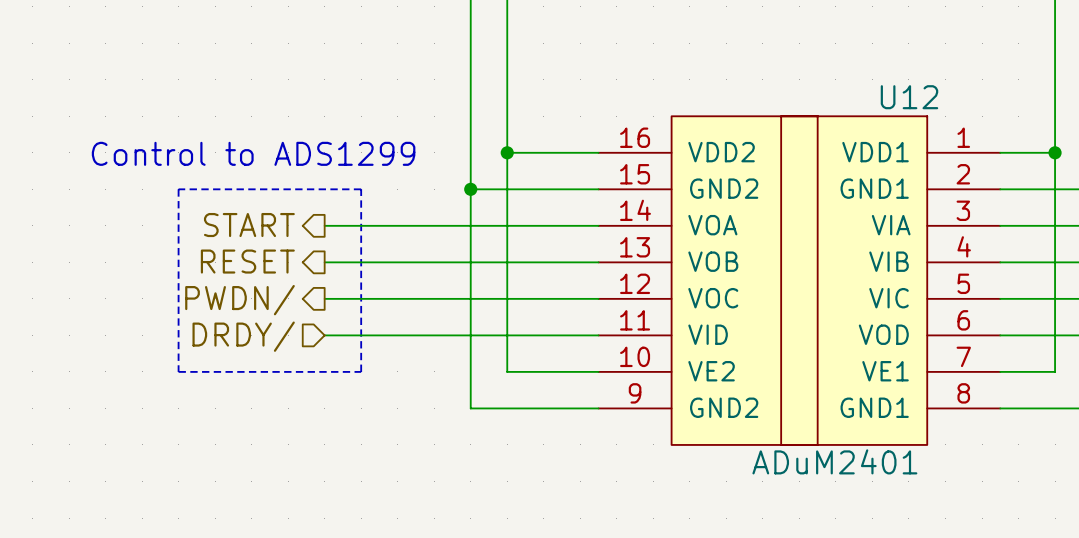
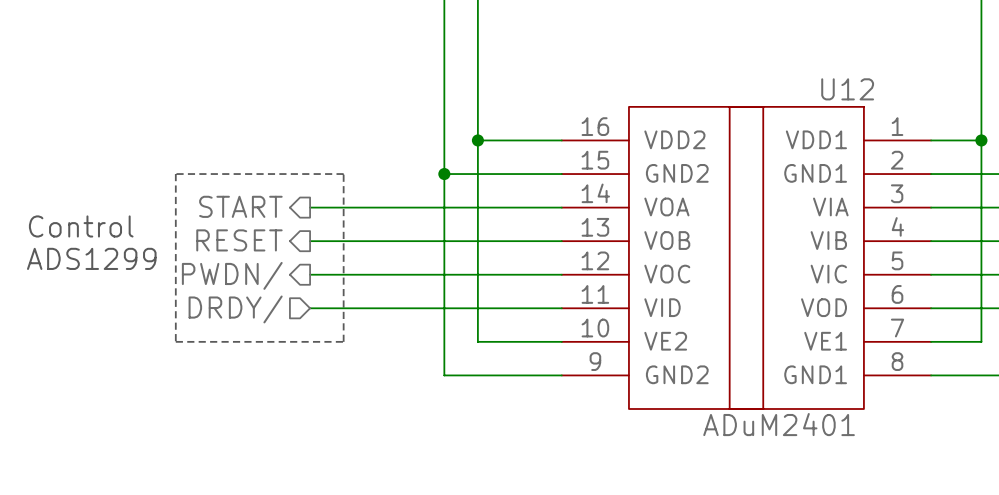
text: Control to ADS1299 (253, 153) -> none
text: none -> Control (81, 226)
text: none -> ADS1299 (91, 258)

